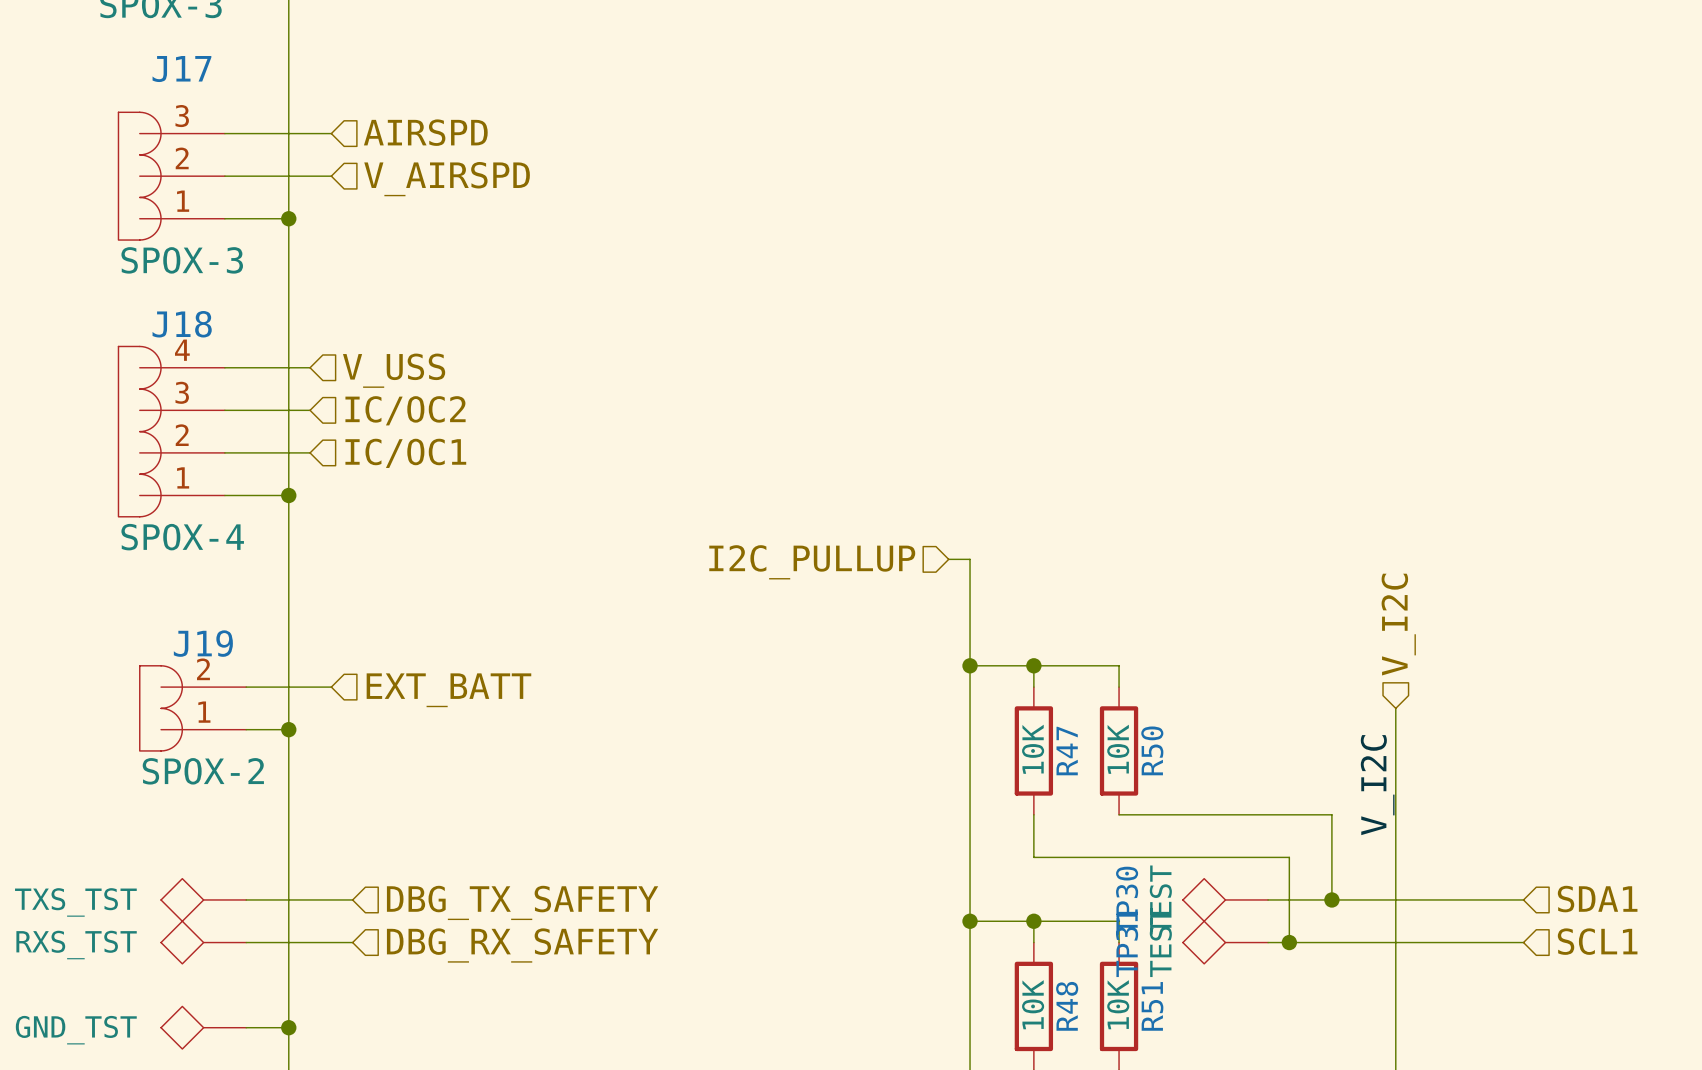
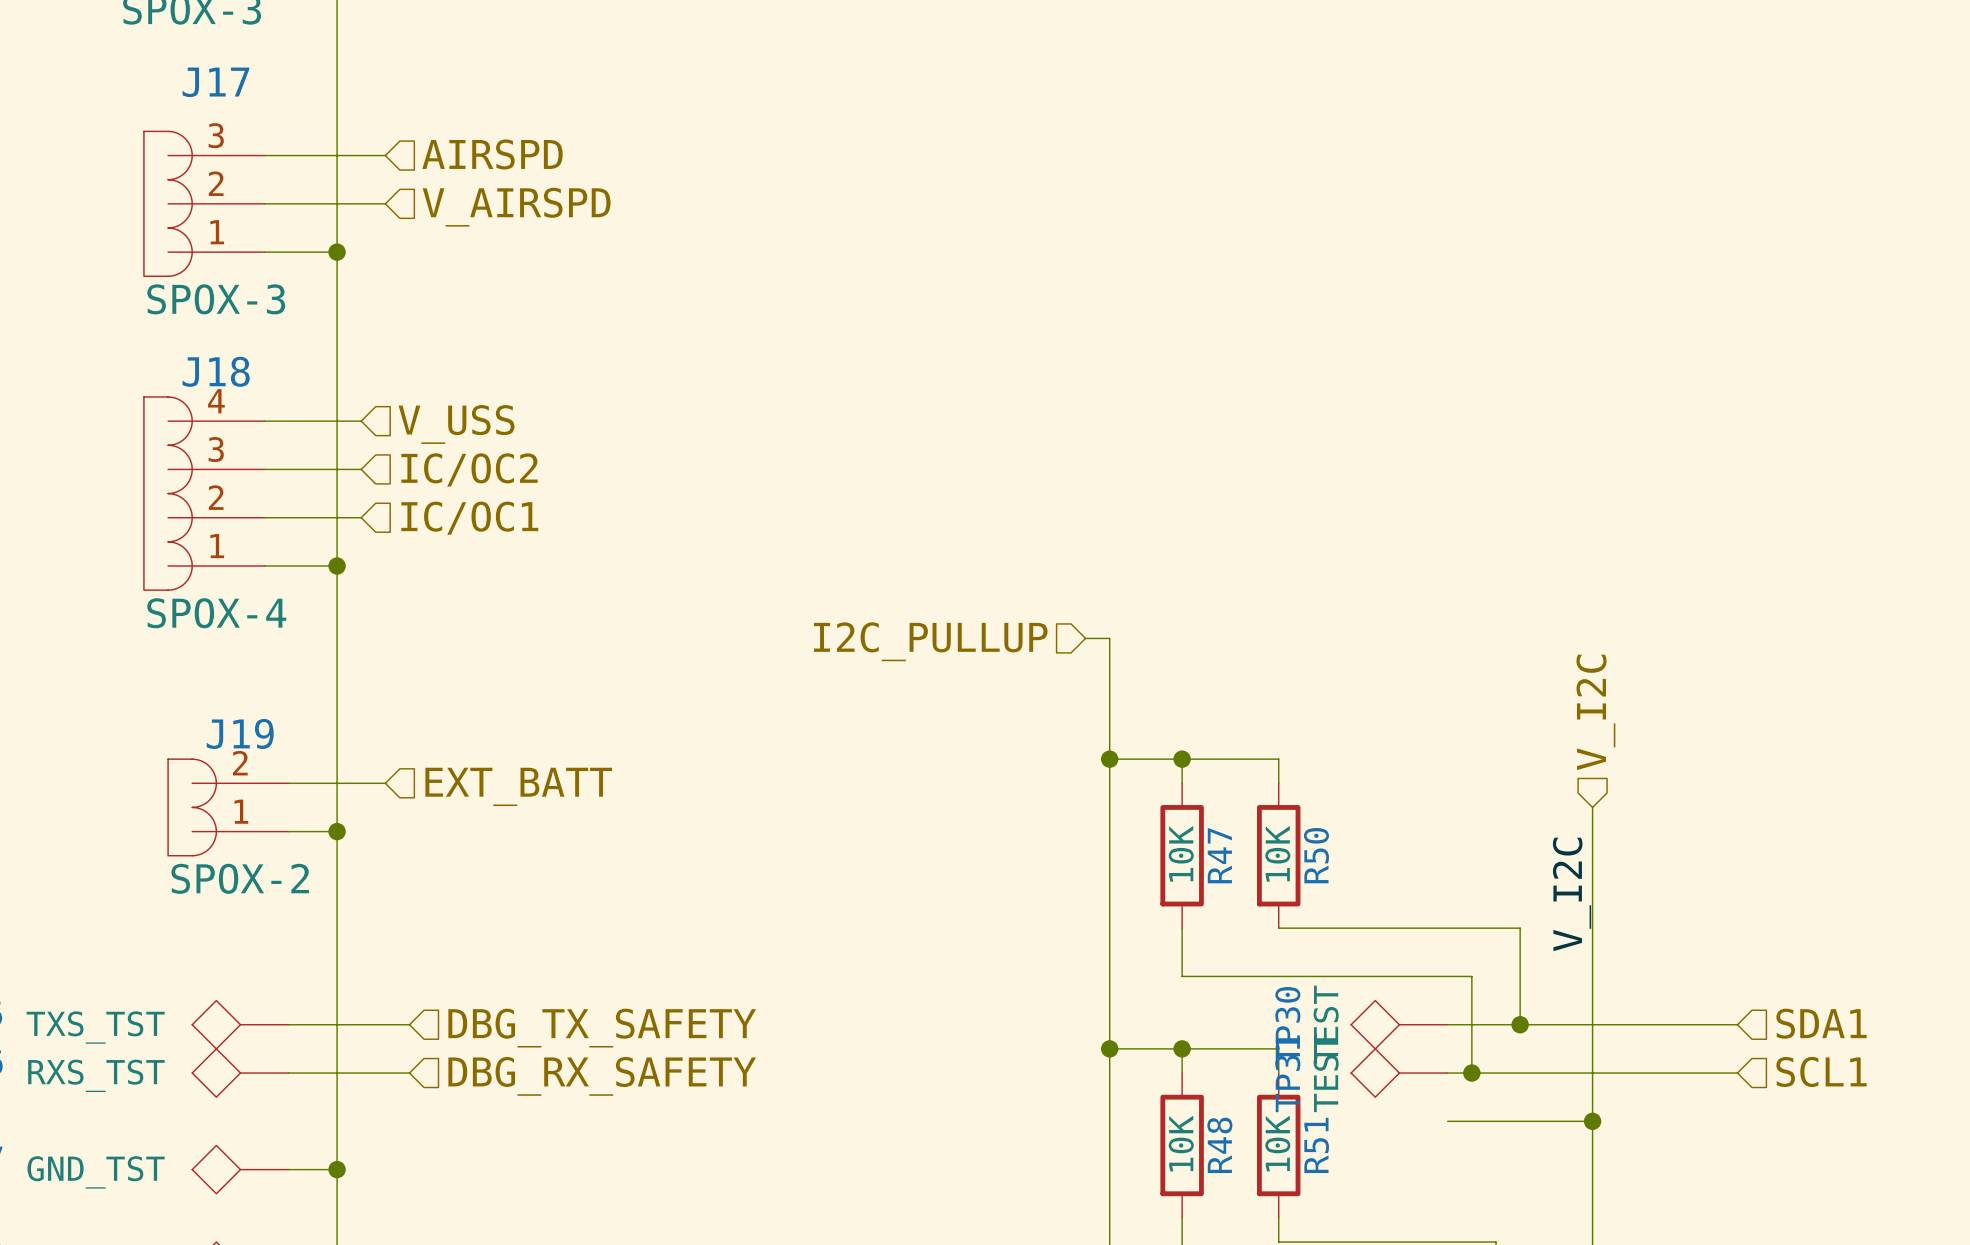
wire: none -> (1447, 1121) (1592, 1121)
junction: none -> (1592, 1121)

